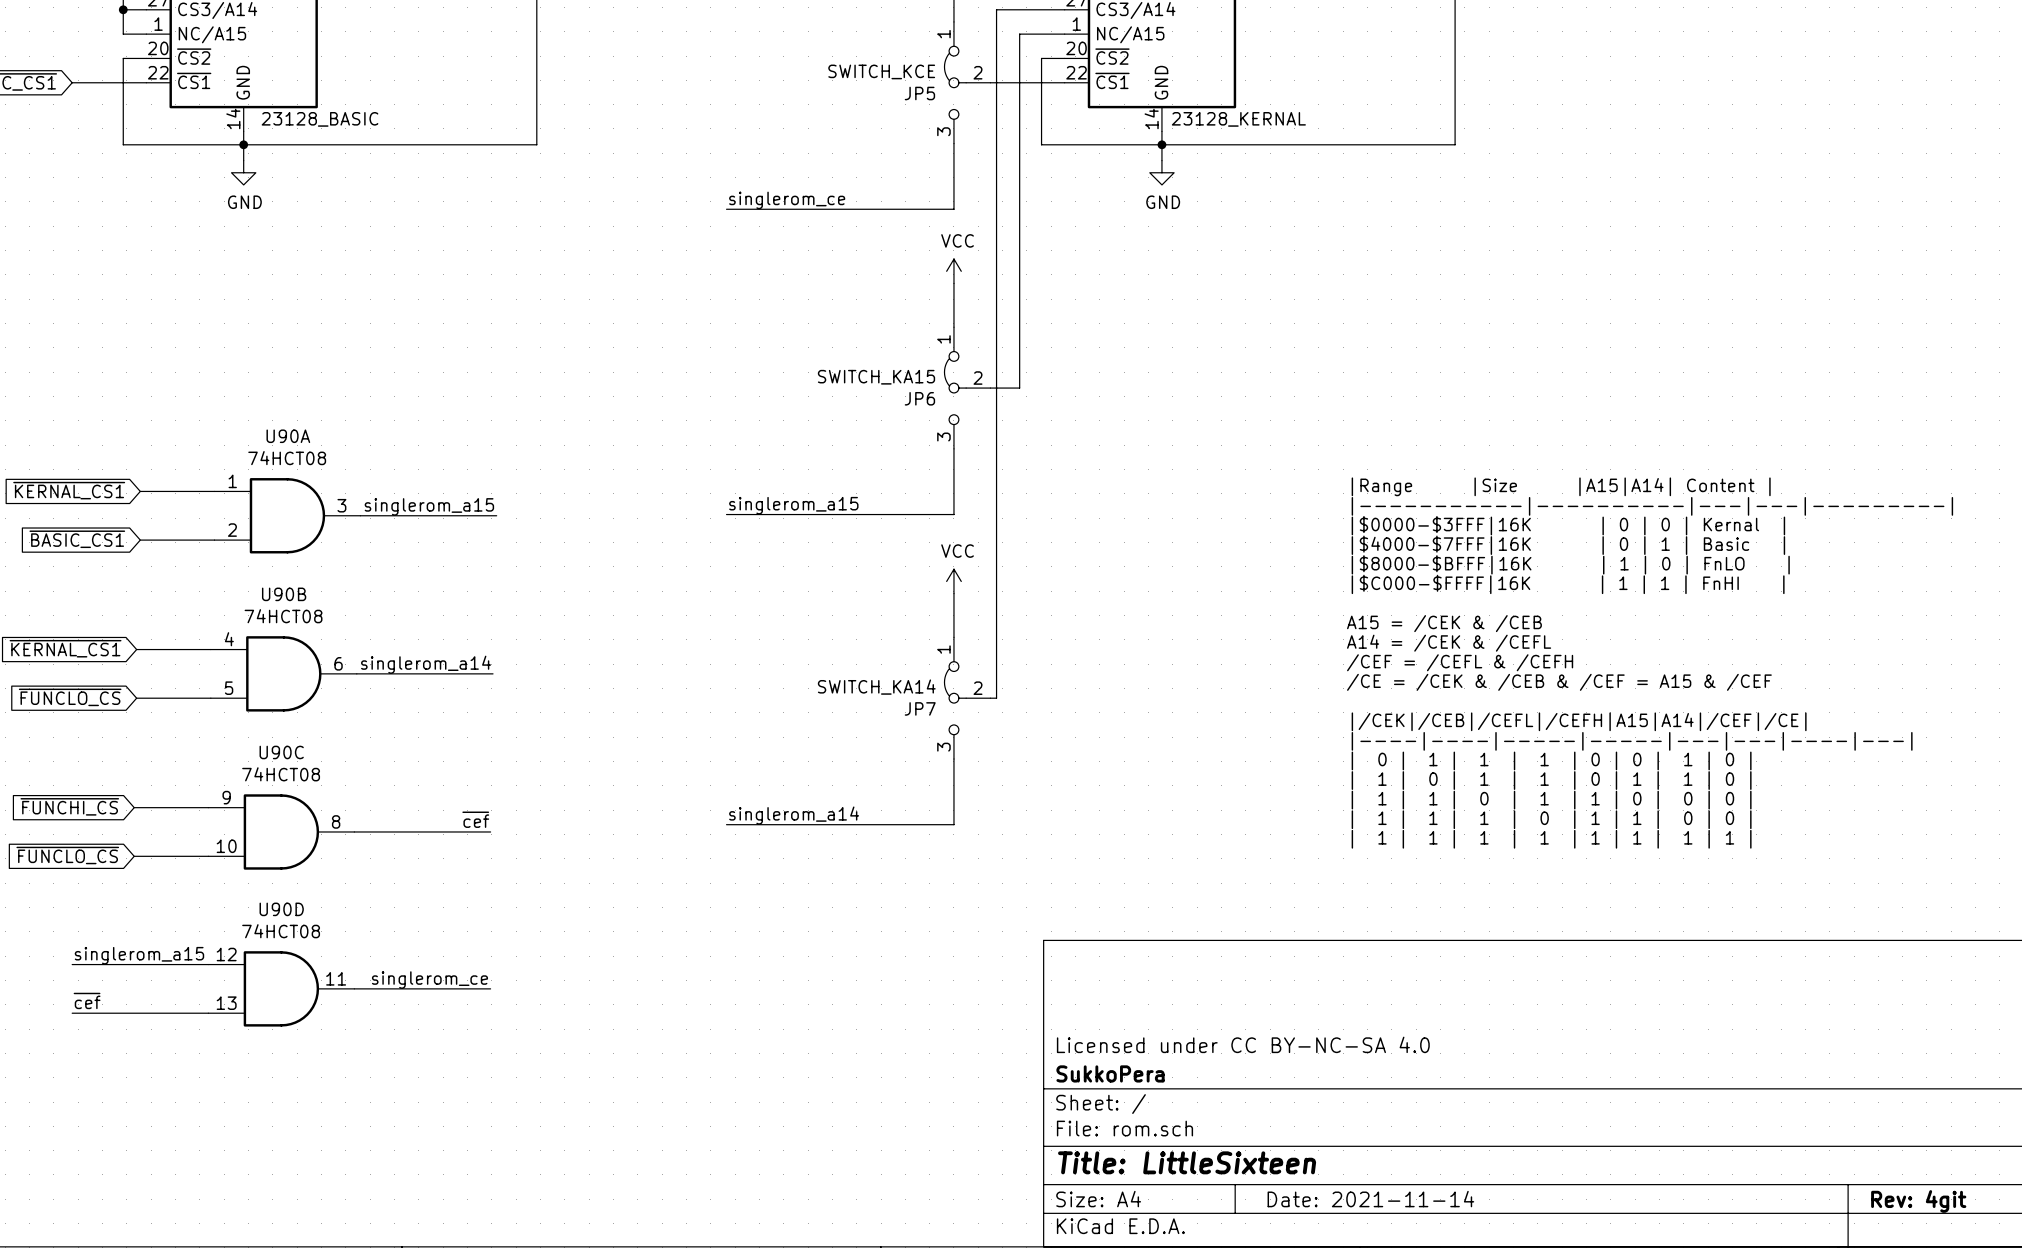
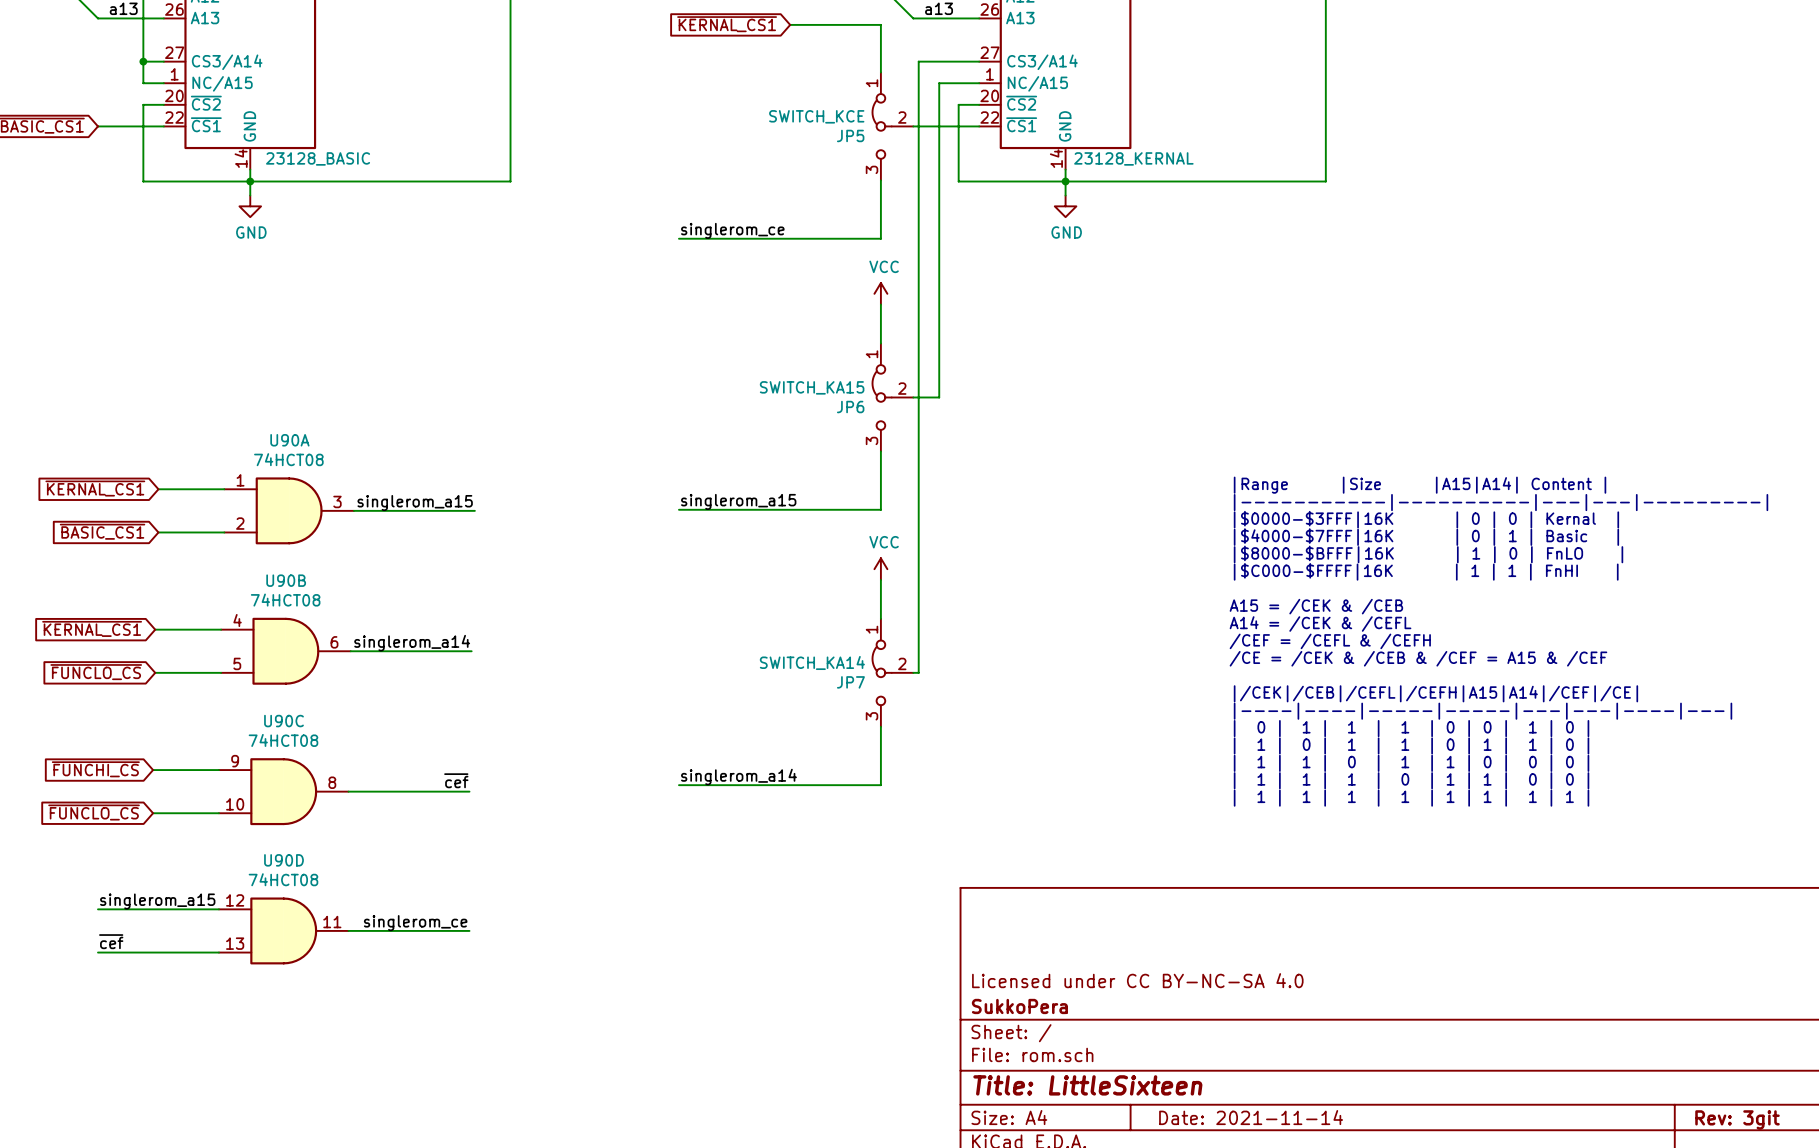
title block: Rev: 4git (1918, 1201) -> Rev: 3git (1737, 1119)

